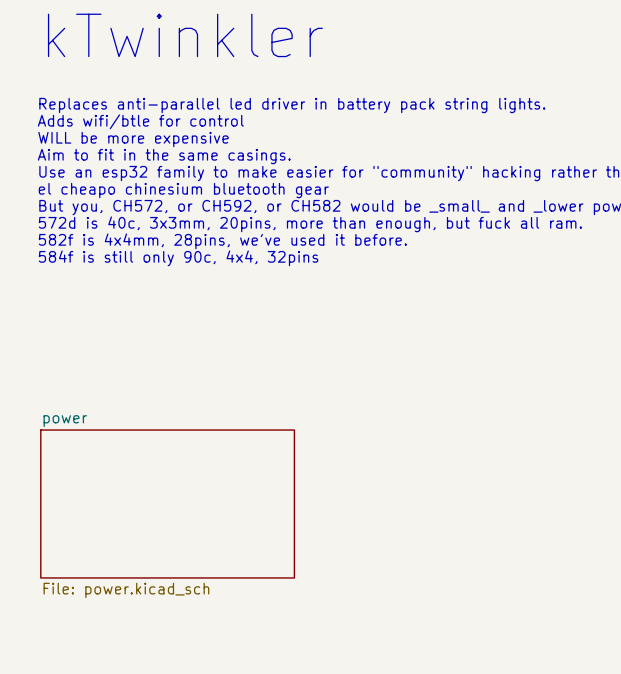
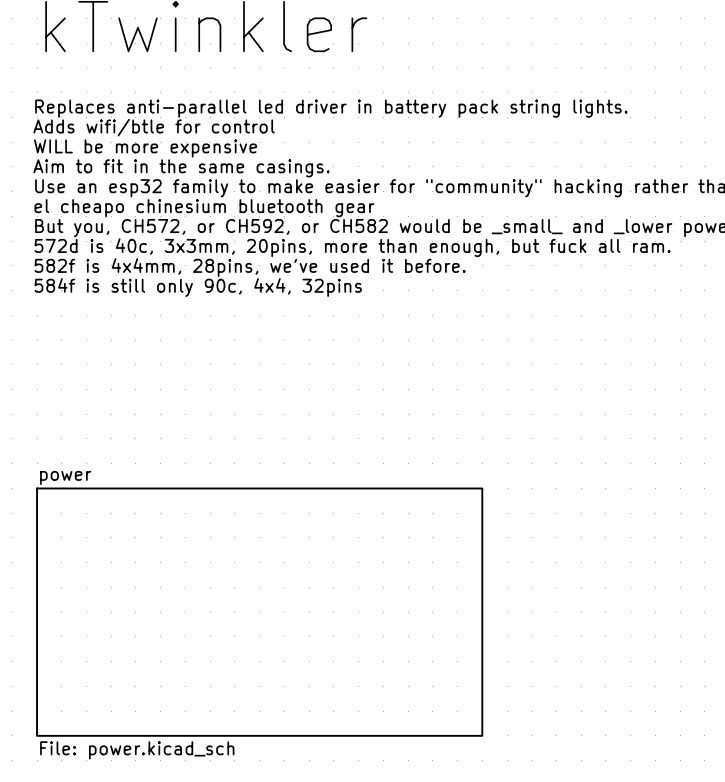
sheet power: File: power.kicad_sch (167, 504) -> none
sheet power: none -> File: power.kicad_sch (259, 612)

